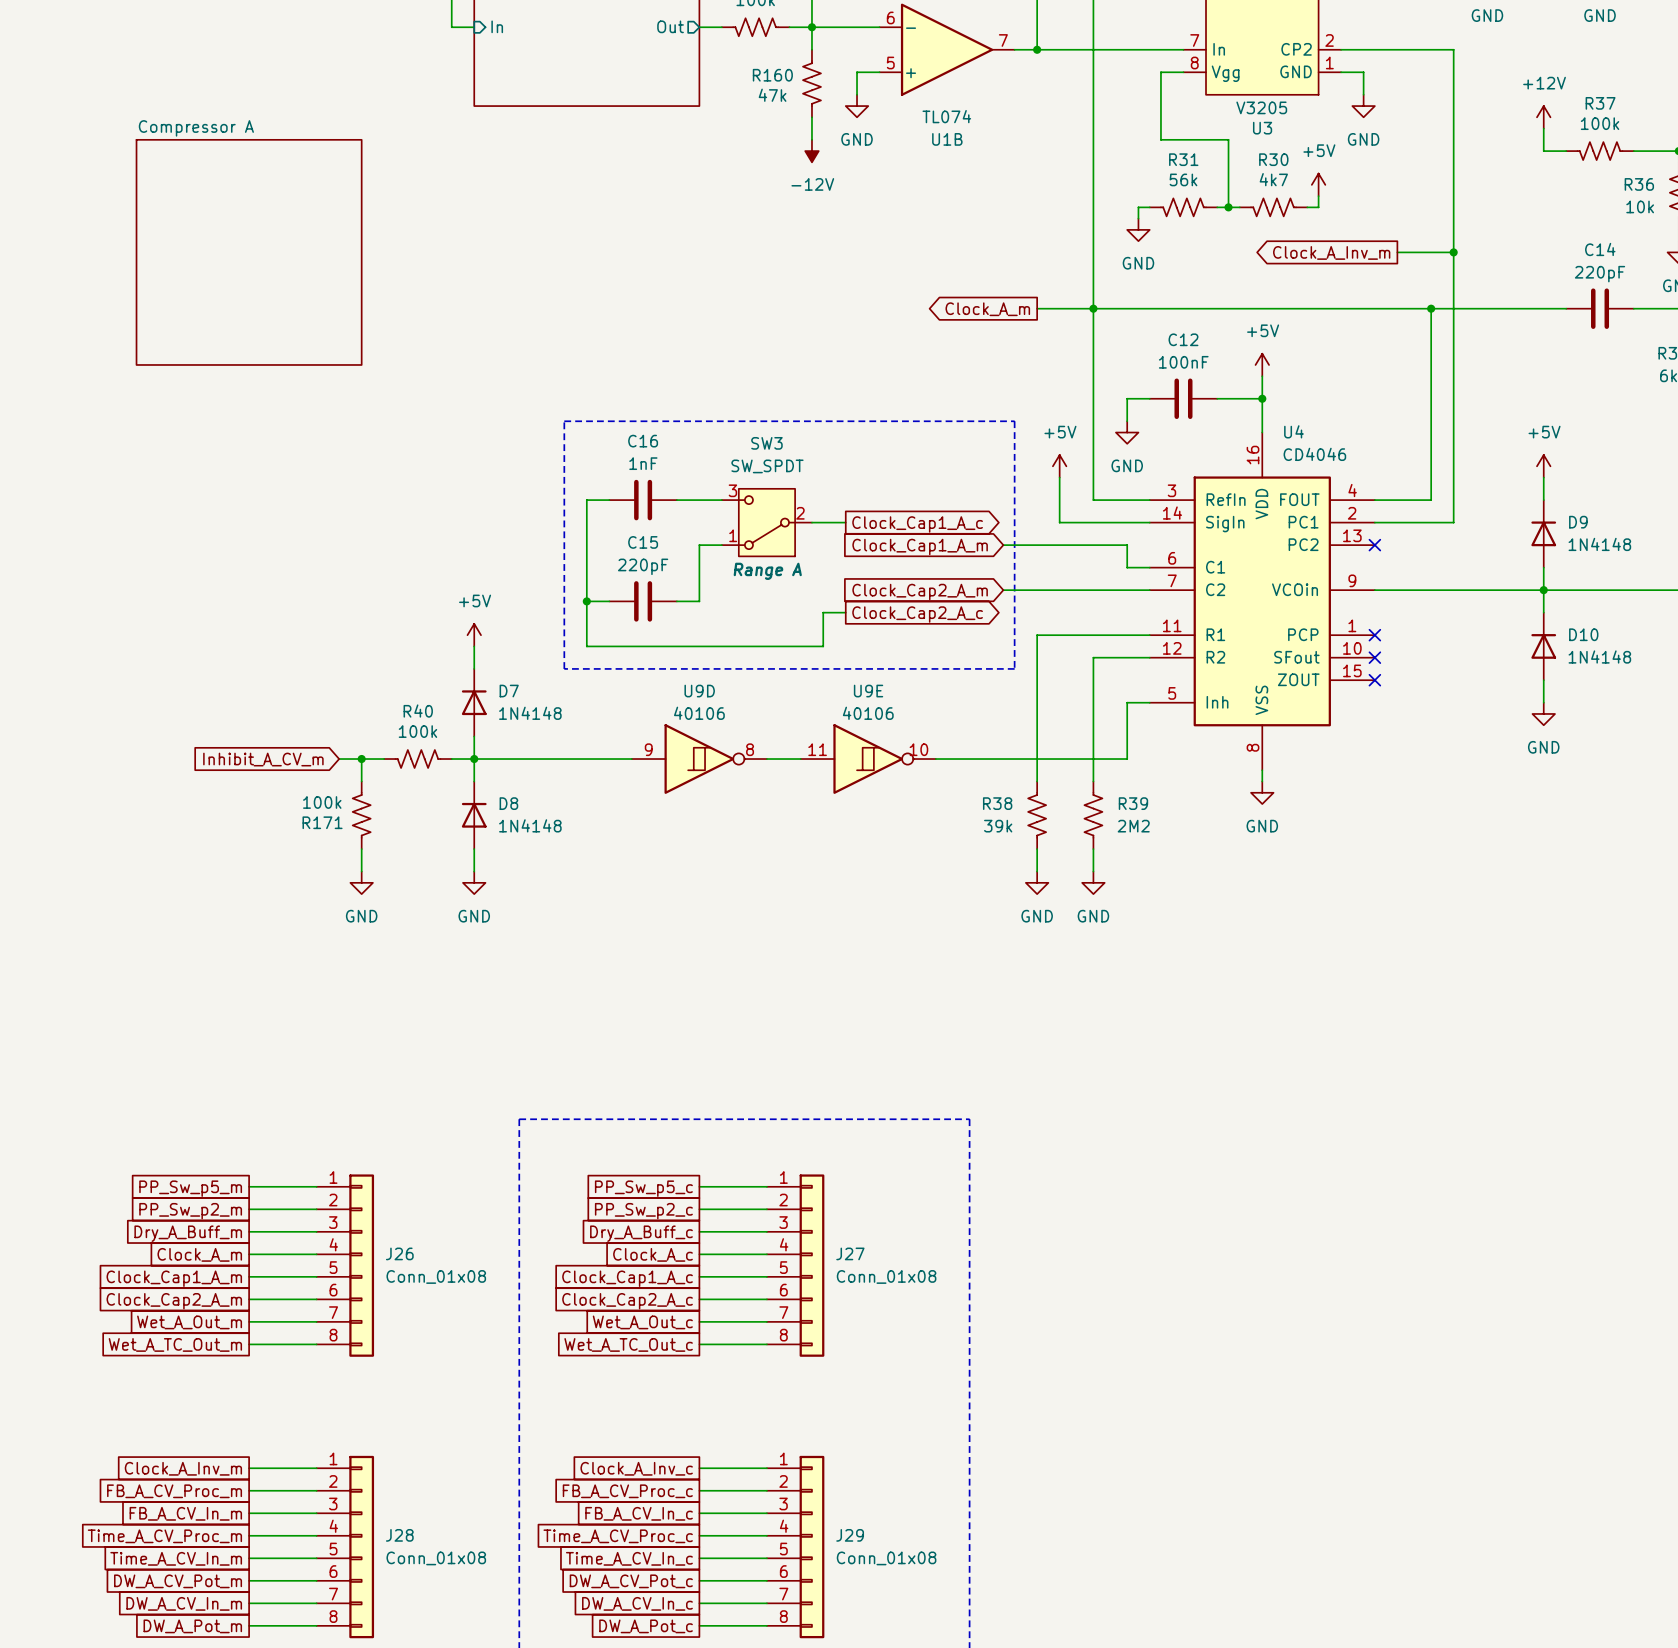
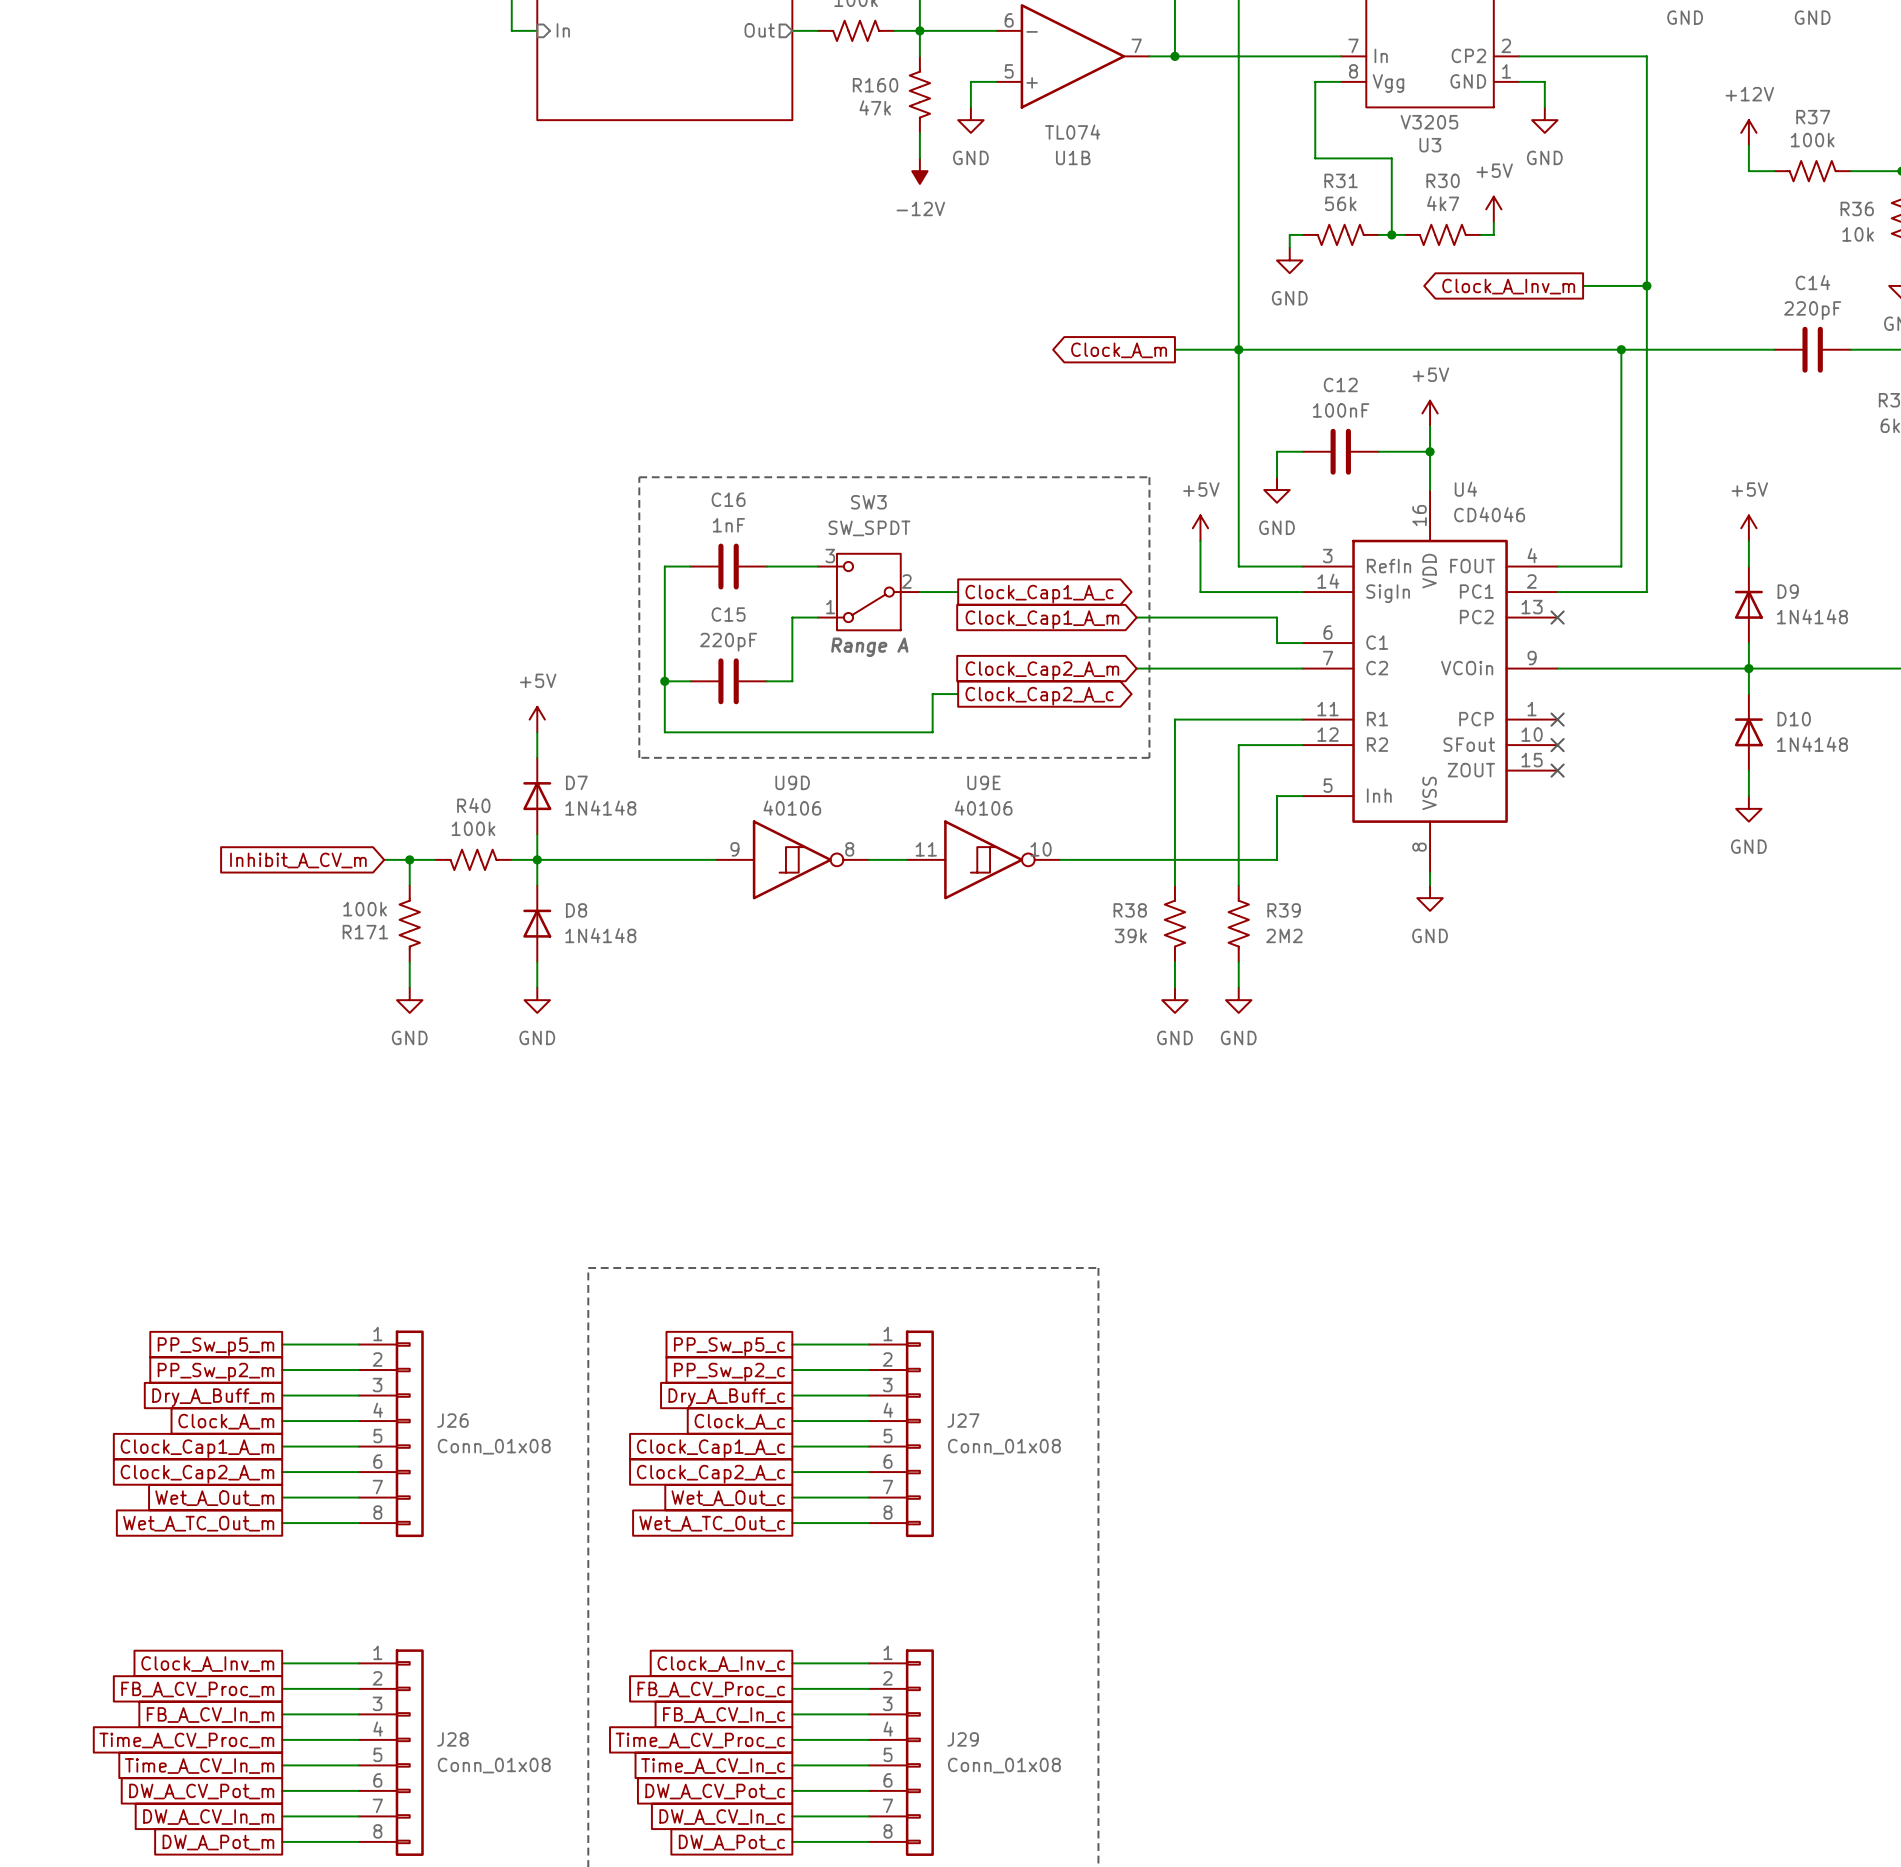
sheet Compressor A: (249, 252) -> none

